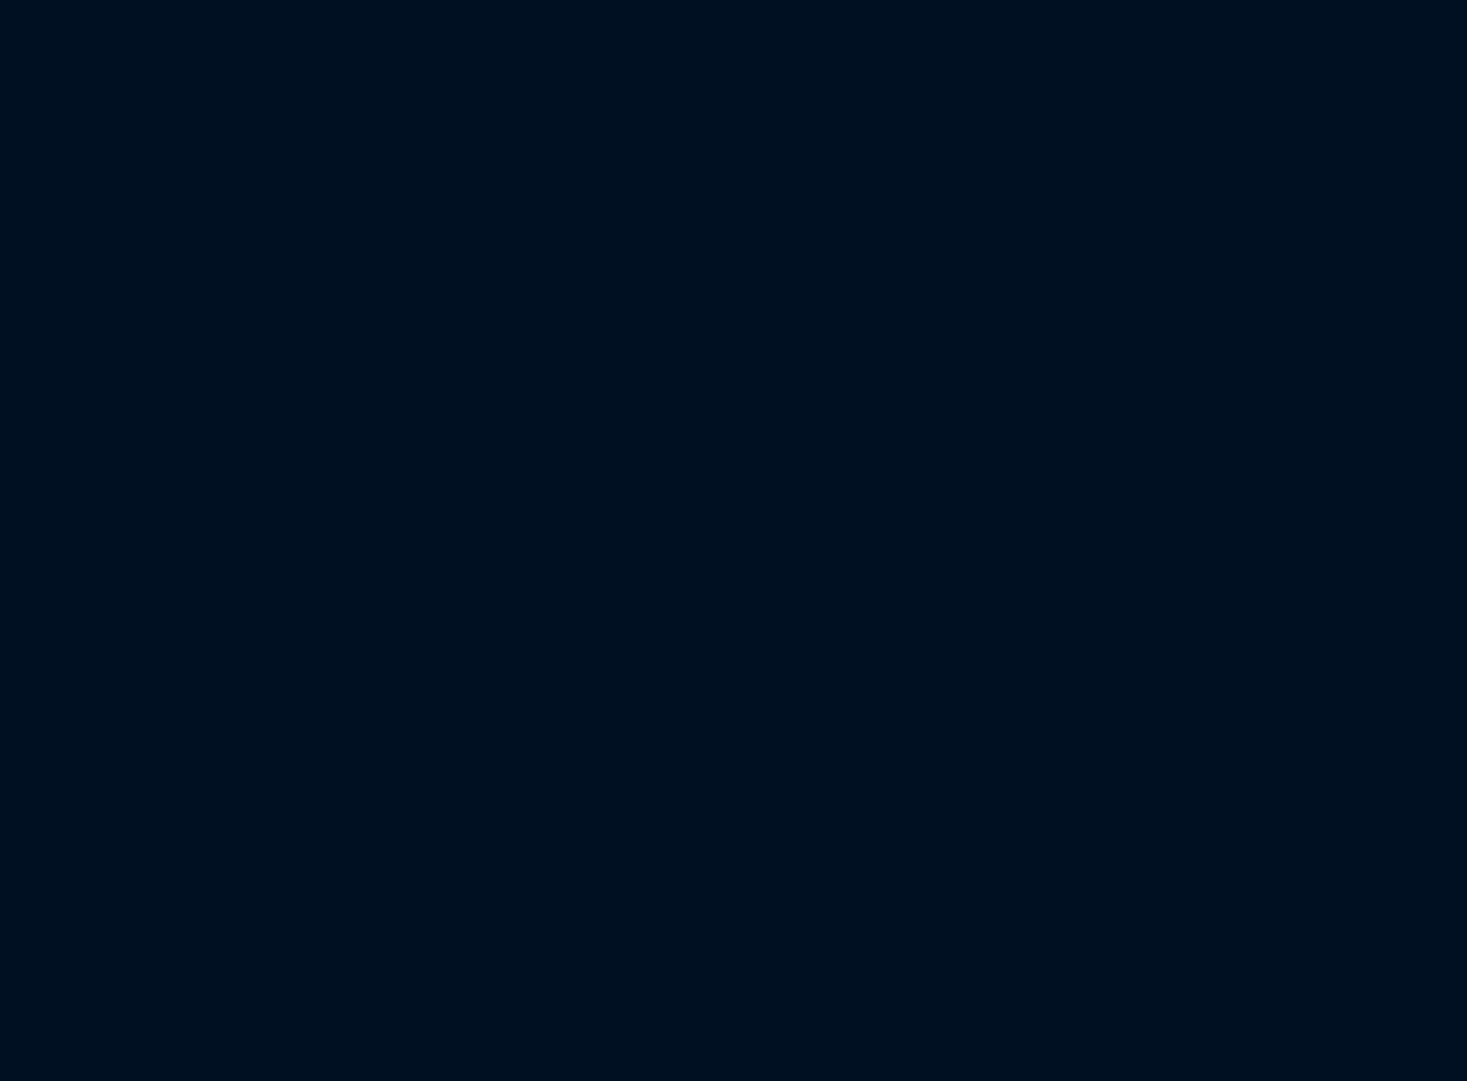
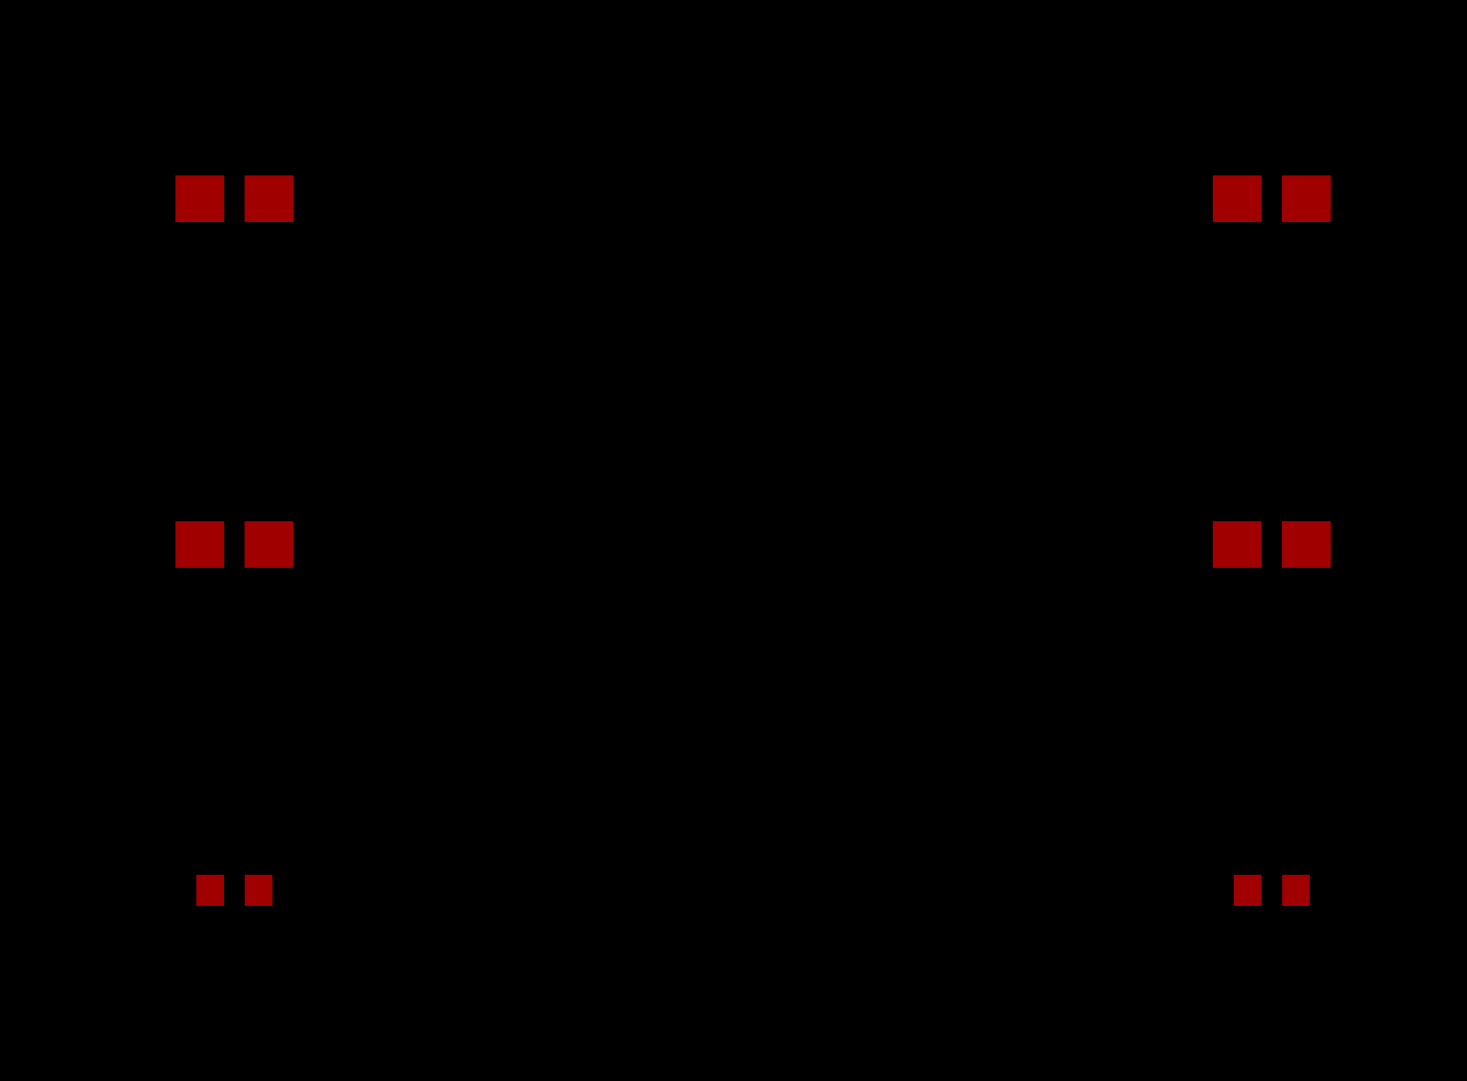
part: none -> (234, 198)
part: none -> (1271, 198)
part: none -> (234, 544)
part: none -> (1271, 544)
part: none -> (234, 890)
part: none -> (1271, 890)

